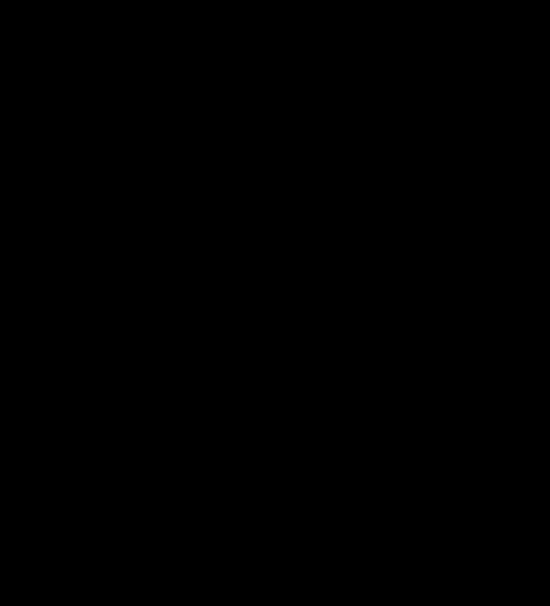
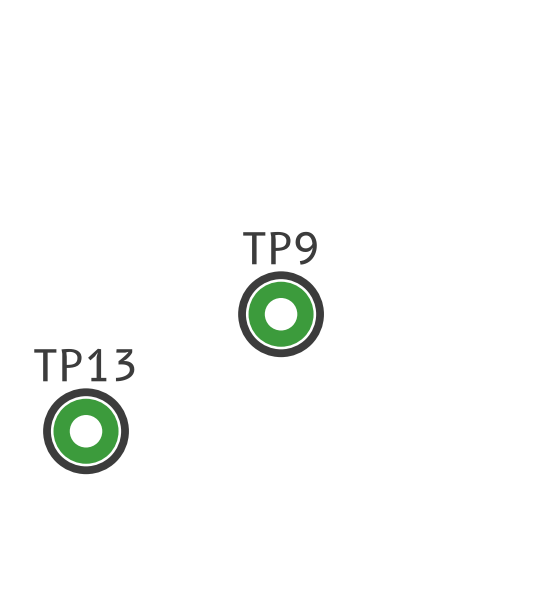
TP9: none -> (281, 314)
TP13: none -> (86, 431)

